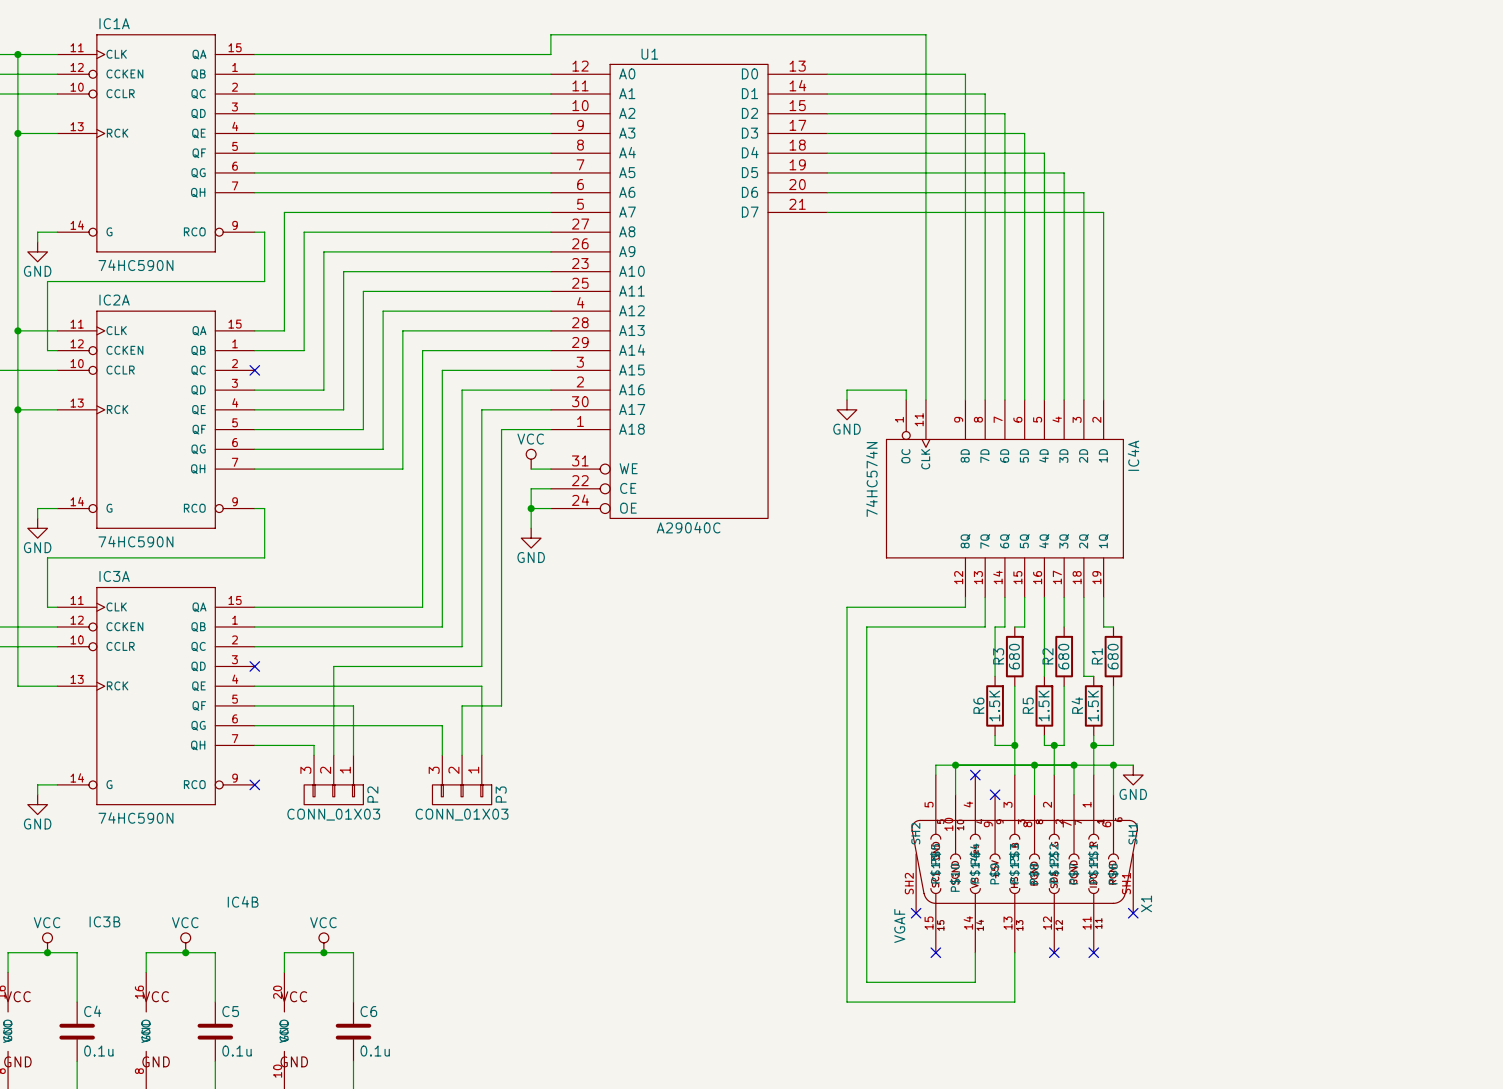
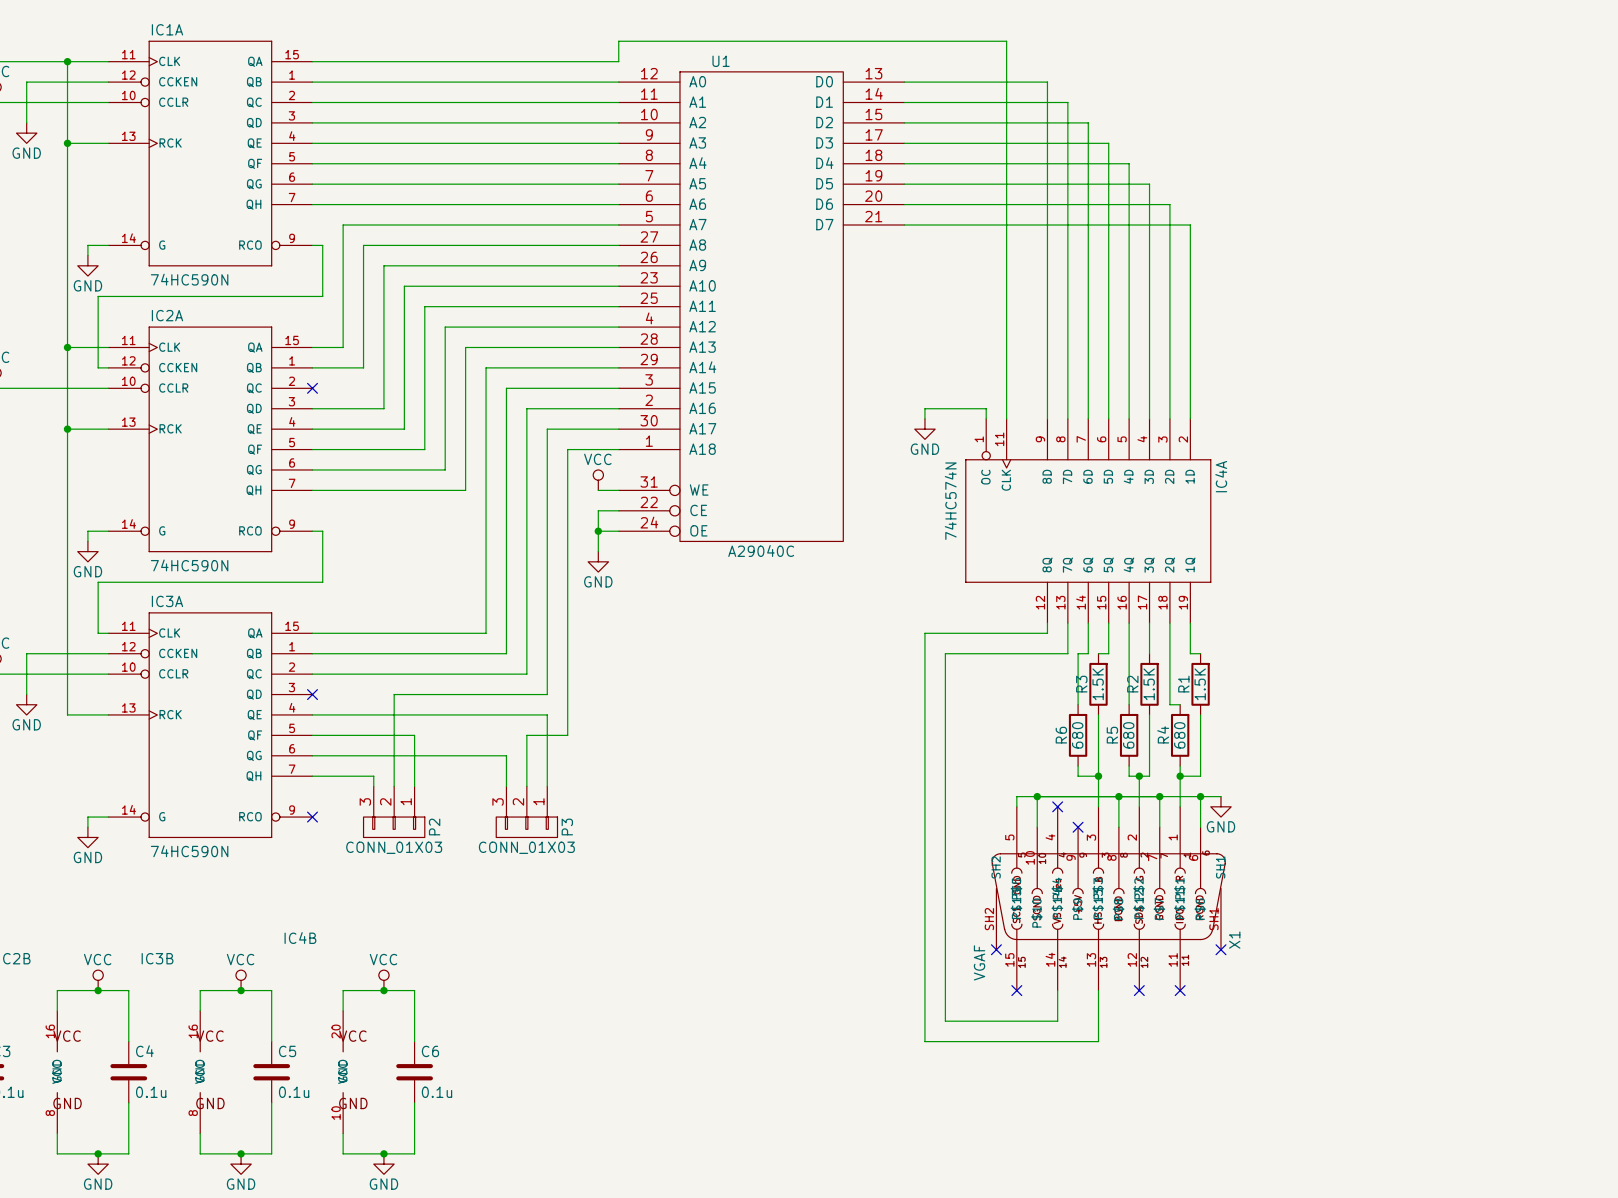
R3 value: 680 (1014, 656) -> 1.5K (1098, 684)
R2 value: 680 (1063, 656) -> 1.5K (1149, 684)
R1 value: 680 (1113, 656) -> 1.5K (1200, 684)
R6 value: 1.5K (994, 705) -> 680 (1077, 735)
R5 value: 1.5K (1044, 705) -> 680 (1128, 735)
R4 value: 1.5K (1093, 705) -> 680 (1179, 735)

